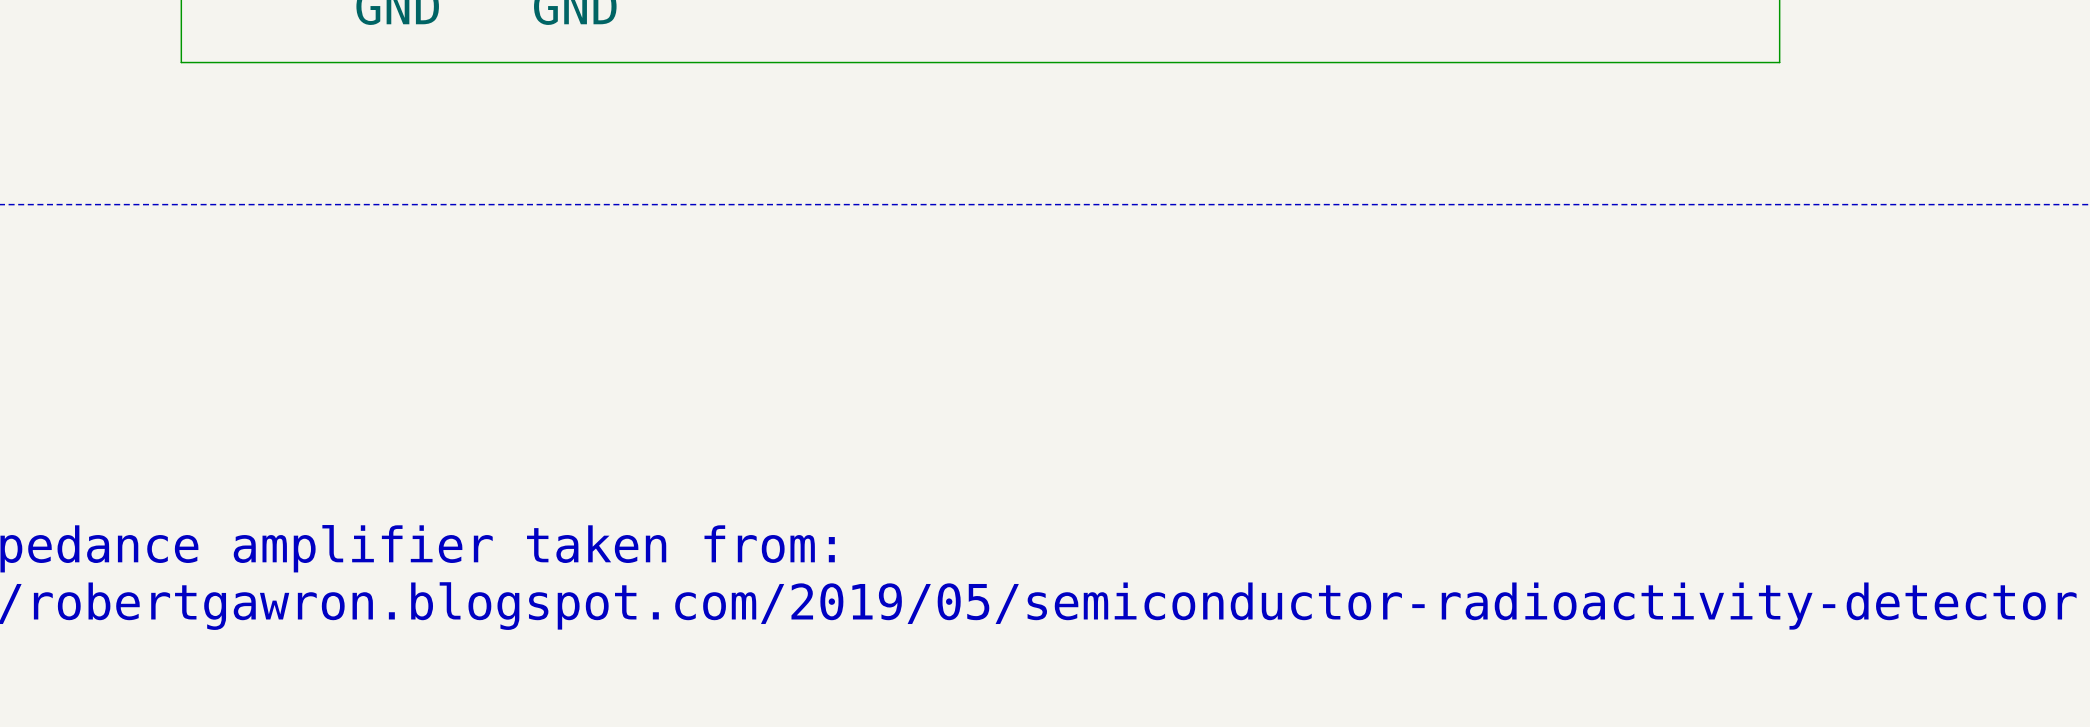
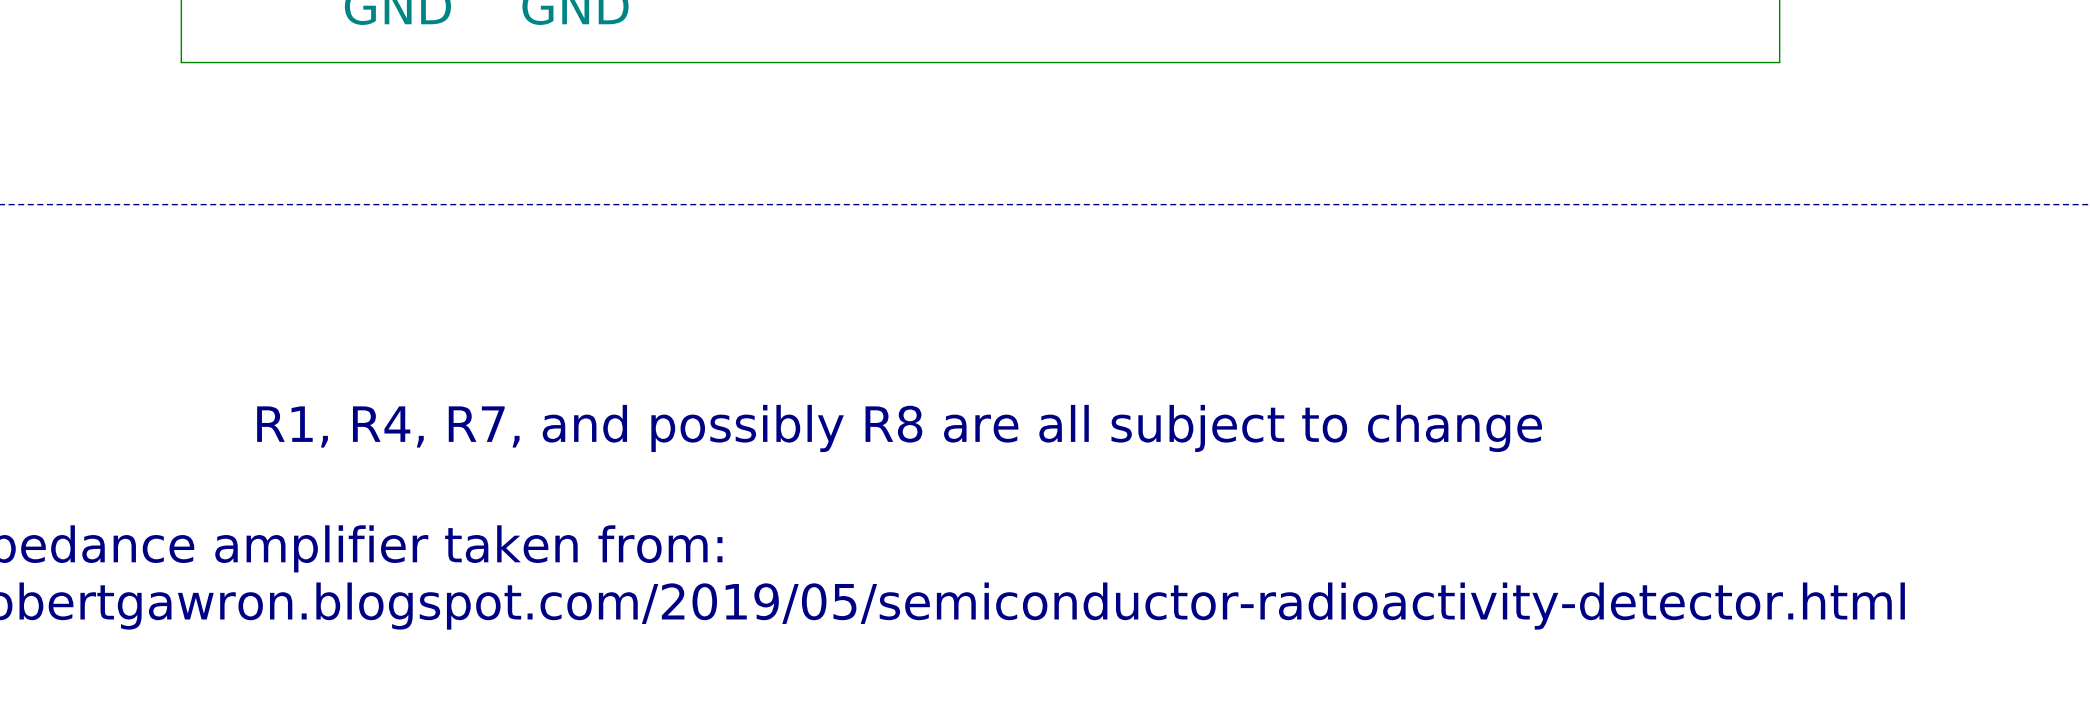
text: none -> R1, R4, R7, and possibly R8 are all subject to change (899, 428)

